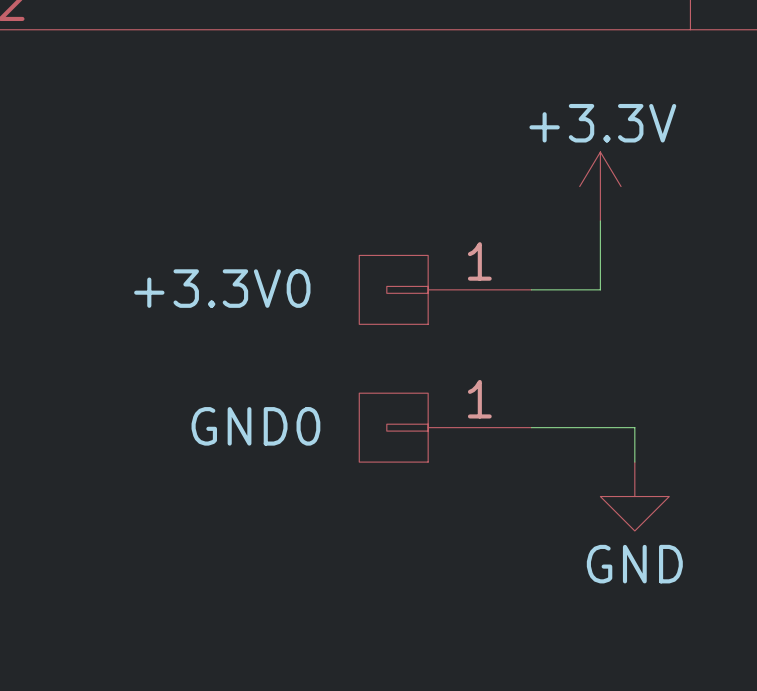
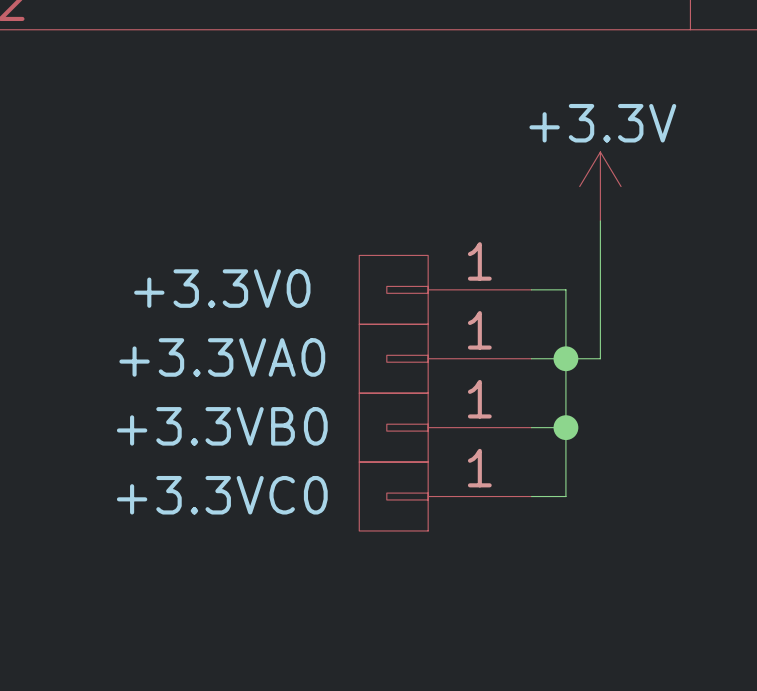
wire: (565, 289) (600, 289) -> (531, 358) (600, 358) (600, 289)
wire: none -> (565, 289) (565, 496) (531, 496)
+3.3VA0: none -> (445, 358)
junction: none -> (565, 358)
GND0 name: GND0 (255, 426) -> +3.3VB0 (222, 426)
wire: (565, 427) (634, 427) (634, 462) -> none
junction: none -> (565, 427)
+3.3VC0: none -> (445, 496)
power symbol: GND (634, 496) -> none

